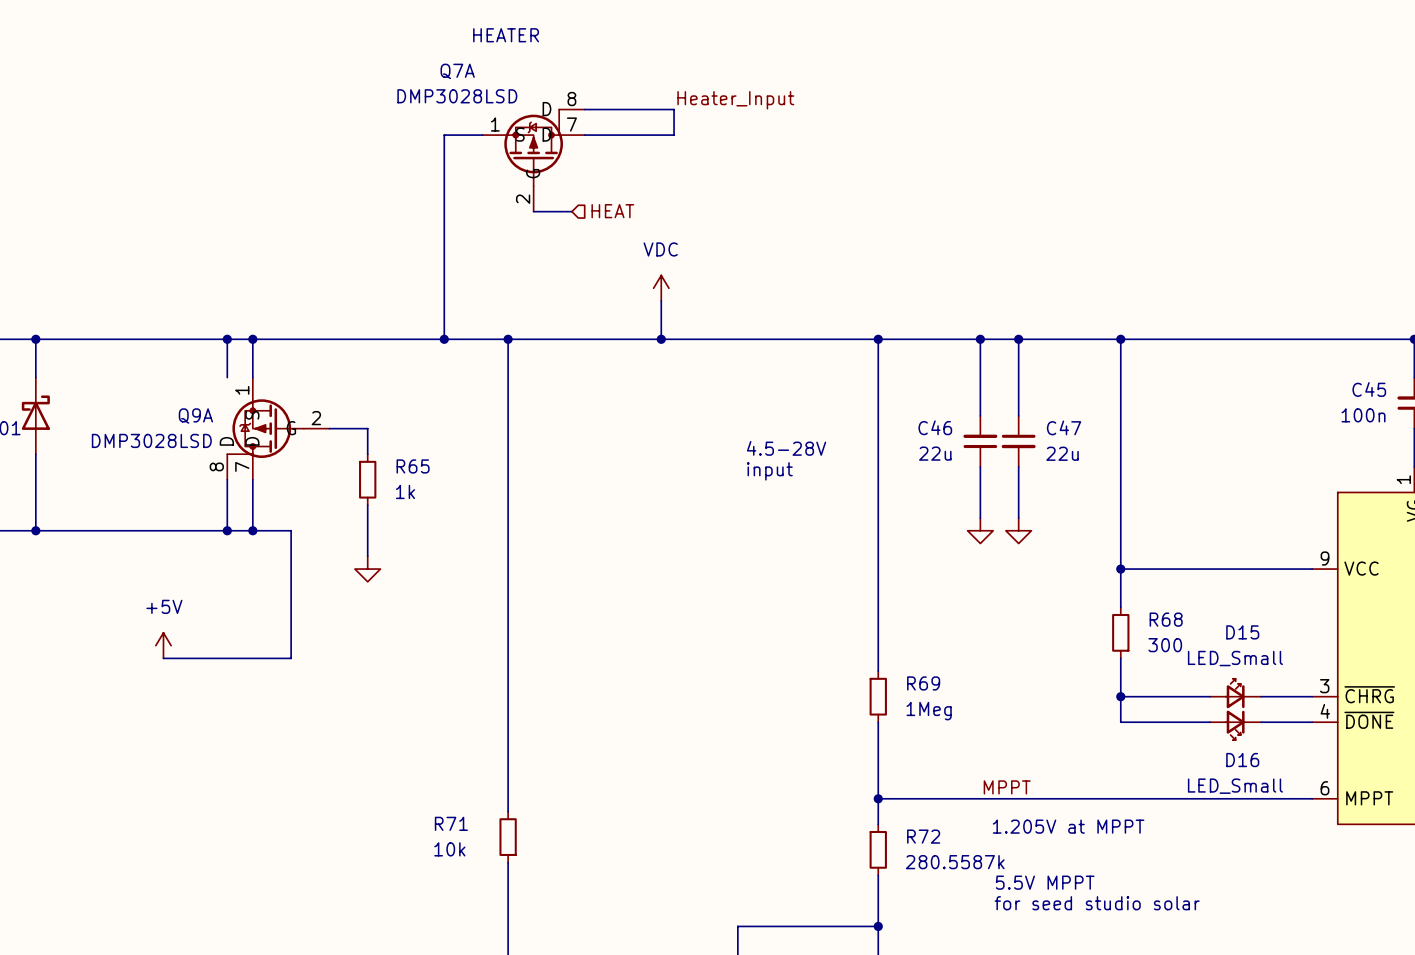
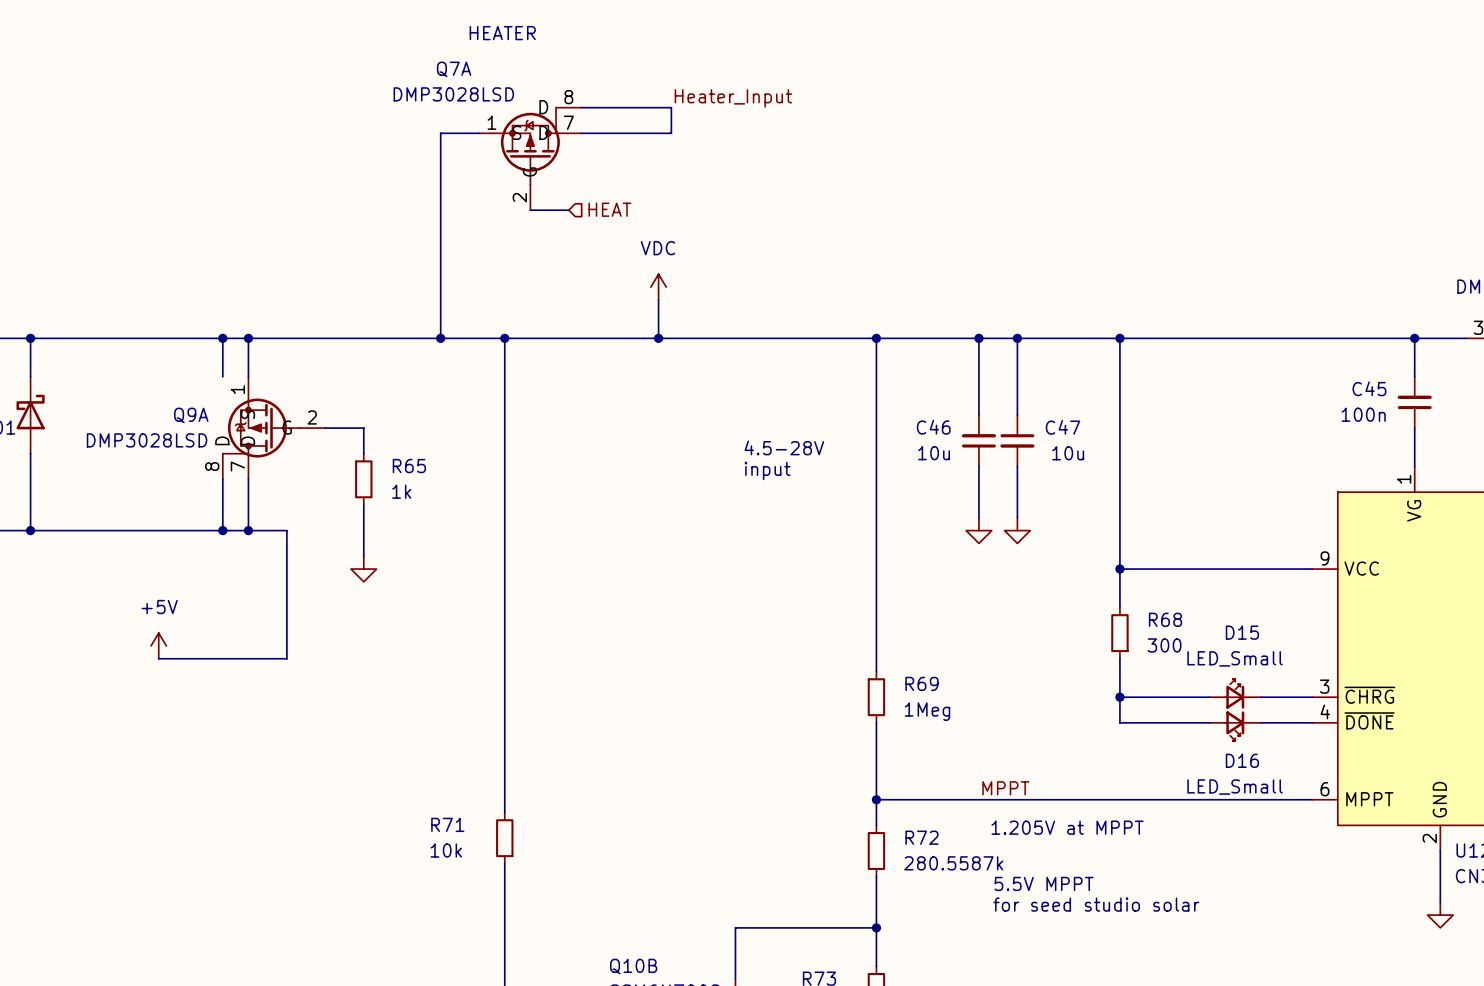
C46 value: 22u (935, 453) -> 10u (934, 453)
C47 value: 22u (1062, 453) -> 10u (1068, 453)

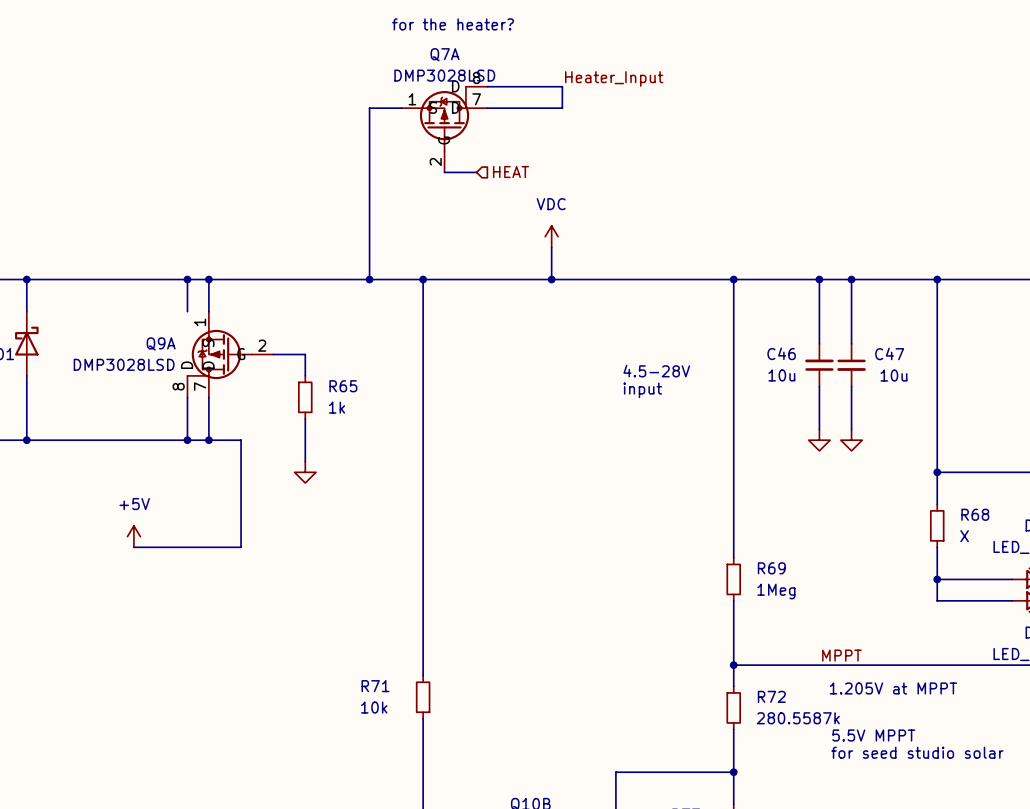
text: HEATER (502, 33) -> for the heater? (453, 24)
Q7A name position: Q7A (454, 69) -> Q7A (445, 54)
Q7A value position: DMP3028LSD (453, 94) -> DMP3028LSD (444, 75)
R68 value: 300 (1164, 645) -> X (964, 536)

